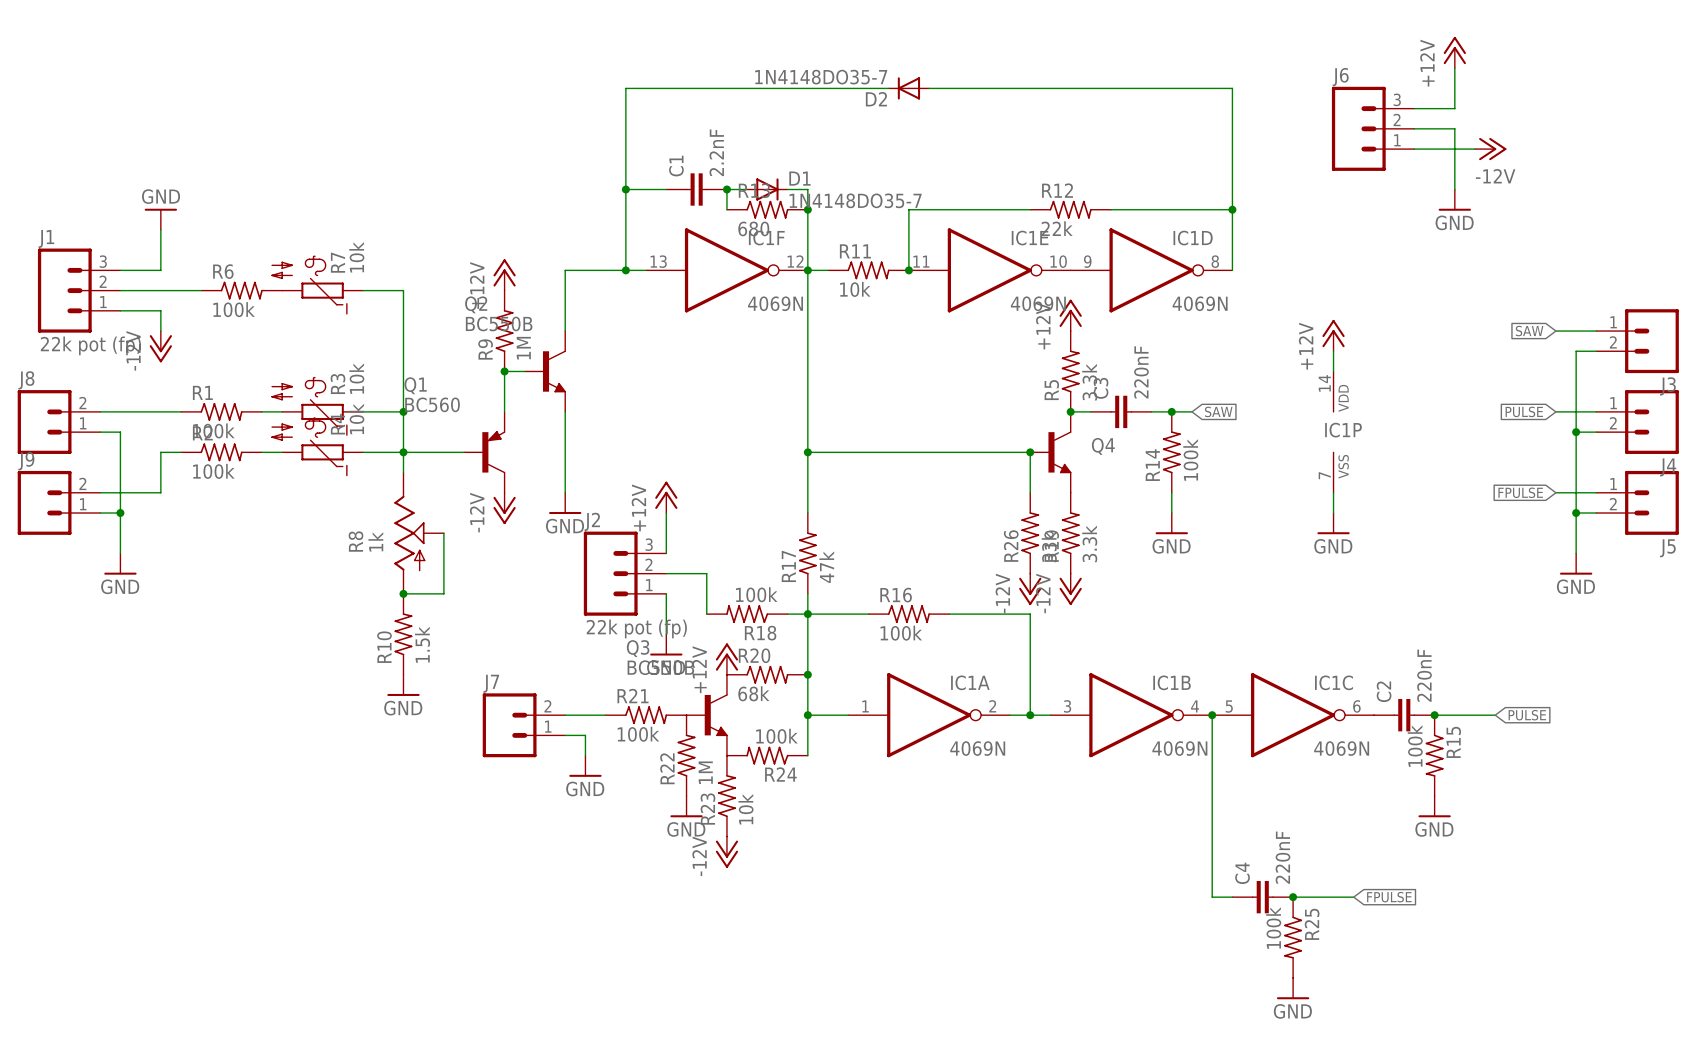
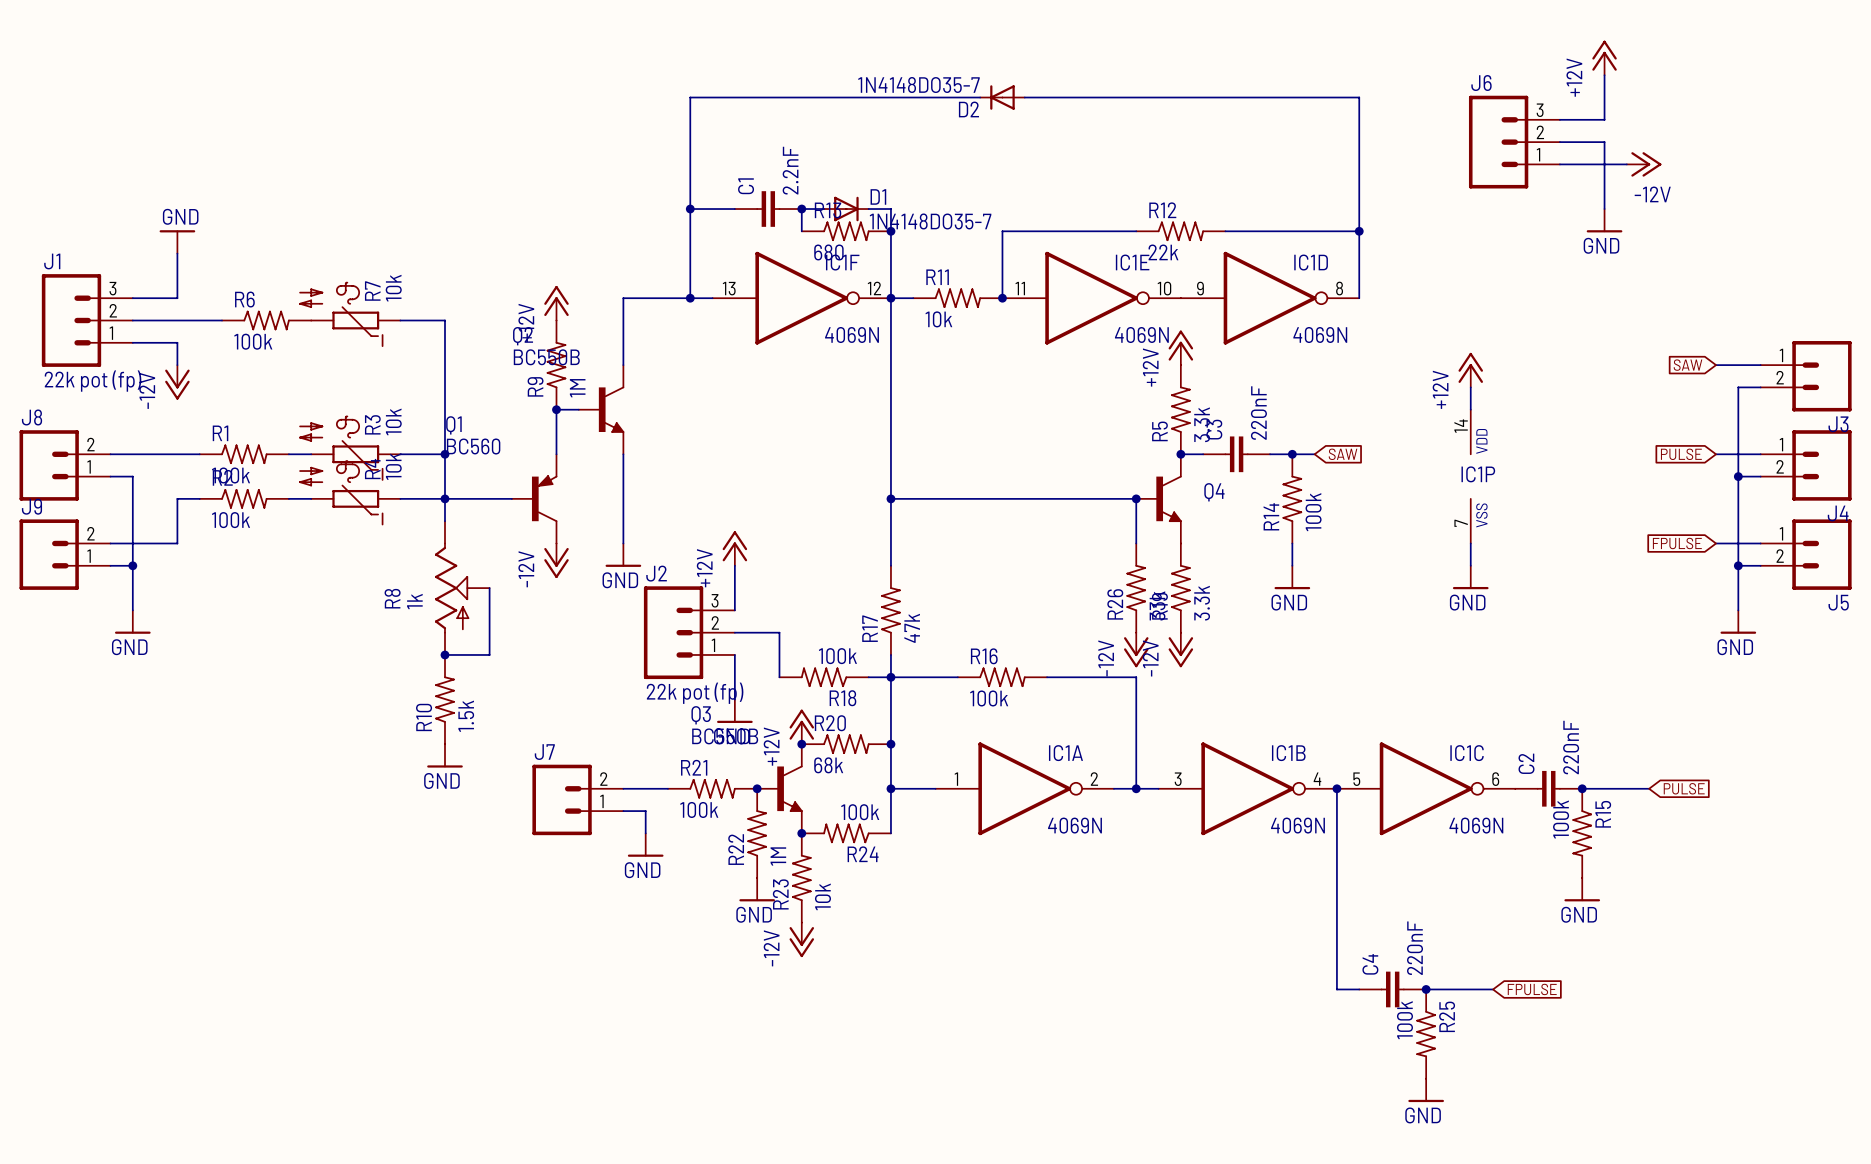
junction: none -> (801, 744)
junction: none -> (757, 788)
junction: none -> (801, 833)

